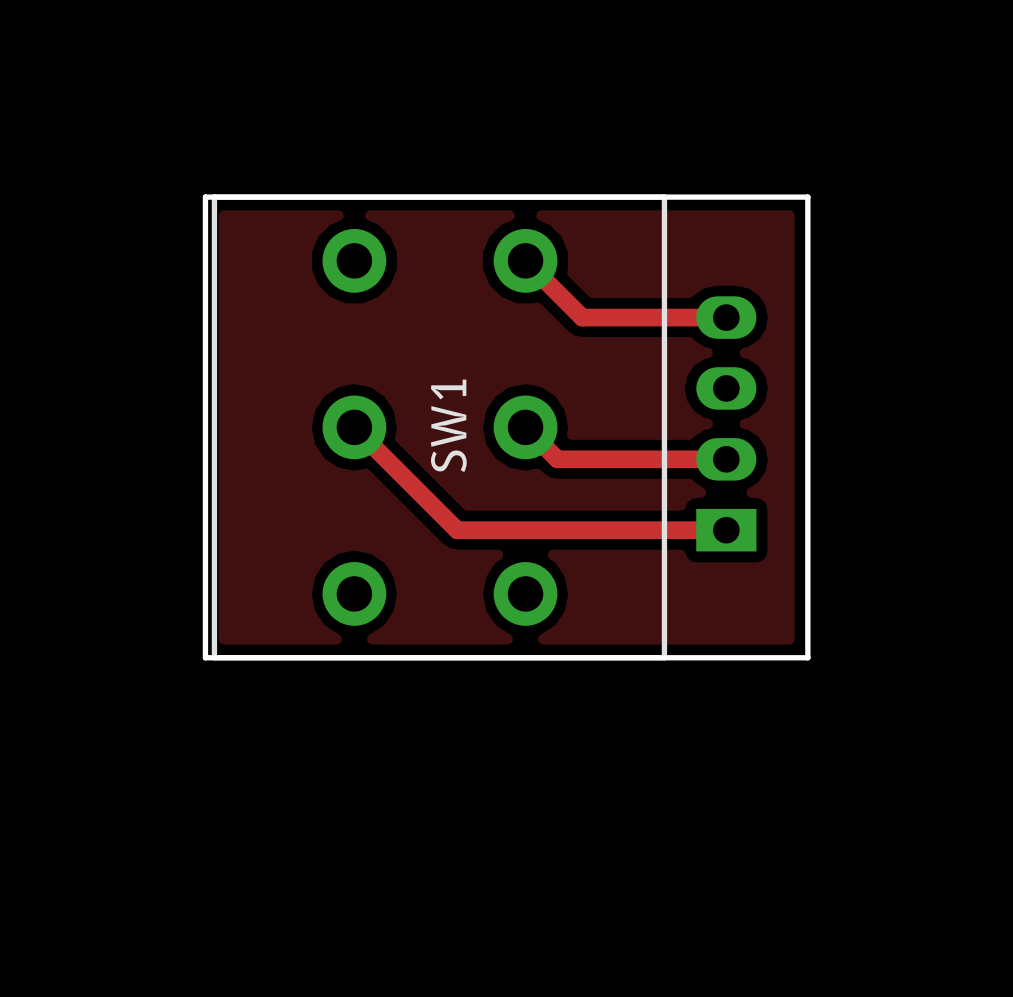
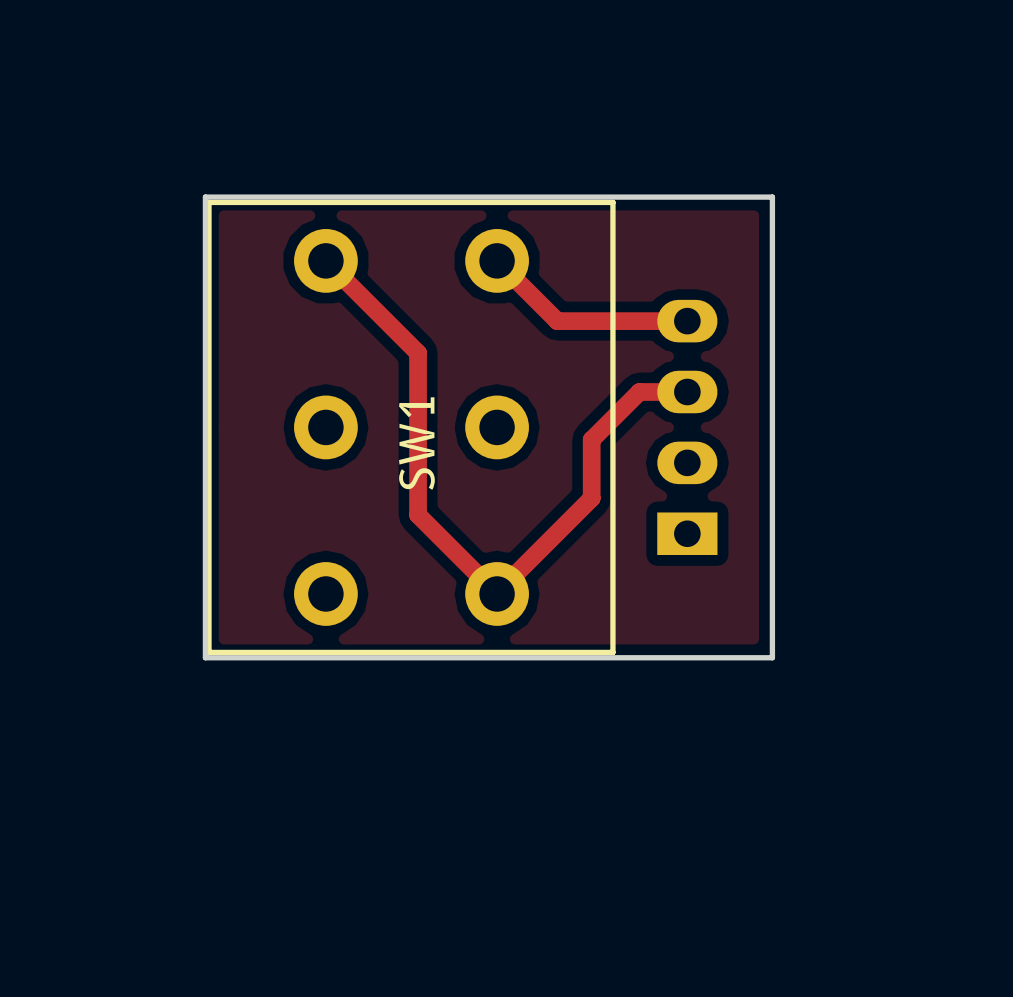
SW1 footprint: [211, 194, 668, 661] -> [206, 199, 616, 656]
board edge: (772, 197) (807, 197) (807, 657) (772, 657) -> (772, 197) (772, 657)
track: none -> (325, 260) (418, 353) (418, 514) (497, 593) (591, 498) (591, 439) (639, 391) (687, 391)
track: none -> (497, 260) (557, 321) (687, 321)
track: (525, 260) (582, 317) (726, 317) -> none
part position: (726, 423) -> (687, 427)
track: (354, 427) (457, 530) (726, 530) -> none
track: (525, 427) (557, 459) (726, 459) -> none

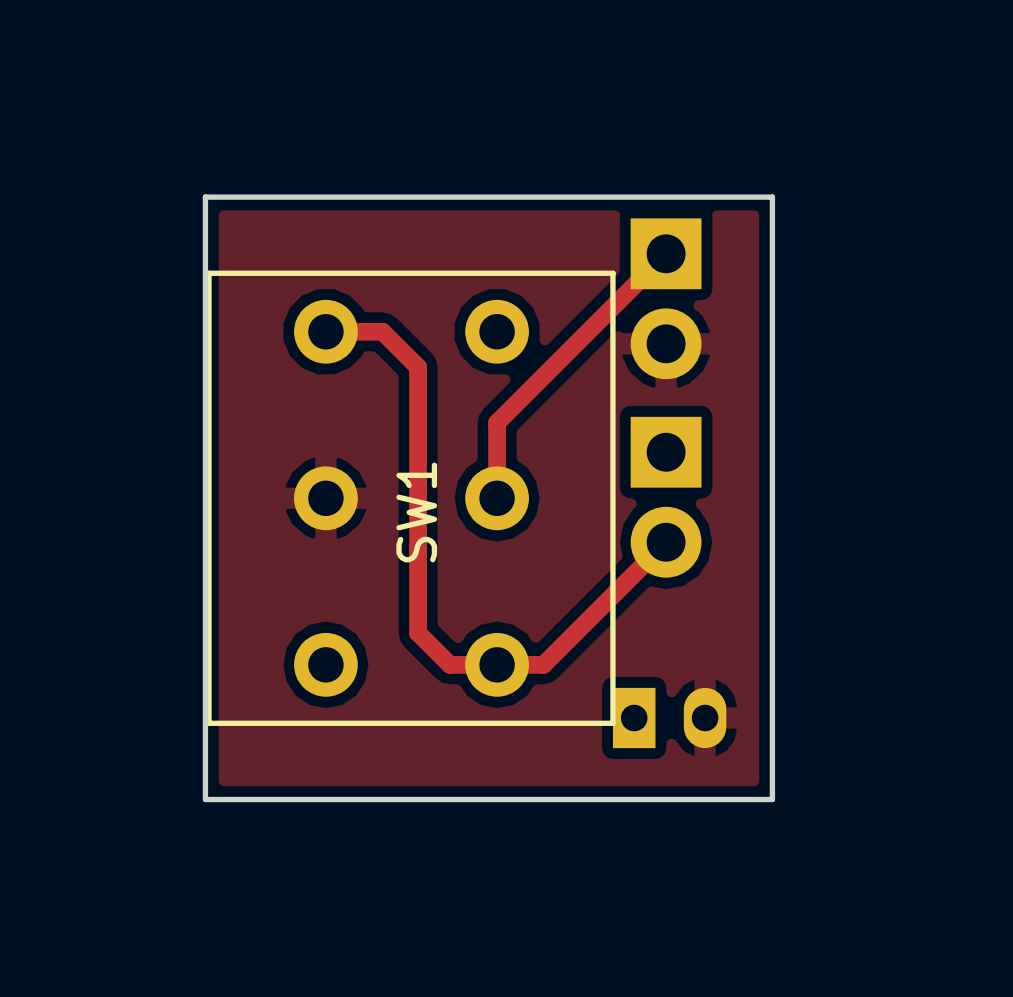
track: none -> (666, 253) (497, 422) (497, 498)
track: (325, 260) (418, 353) (418, 367) -> (325, 331) (382, 331) (418, 367)
track: (497, 260) (557, 321) (687, 321) -> none
part: none -> (666, 298)
track: (687, 391) (639, 391) (591, 439) (591, 498) (497, 593) (418, 514) -> (666, 542) (543, 664) (449, 664) (418, 632) (418, 514)
SW1 position: (410, 427) -> (410, 498)
part: (687, 427) -> none
part: none -> (666, 497)
board edge: (205, 657) (772, 657) -> (205, 657) (205, 799) (772, 799) (772, 657)
part: none -> (669, 718)

